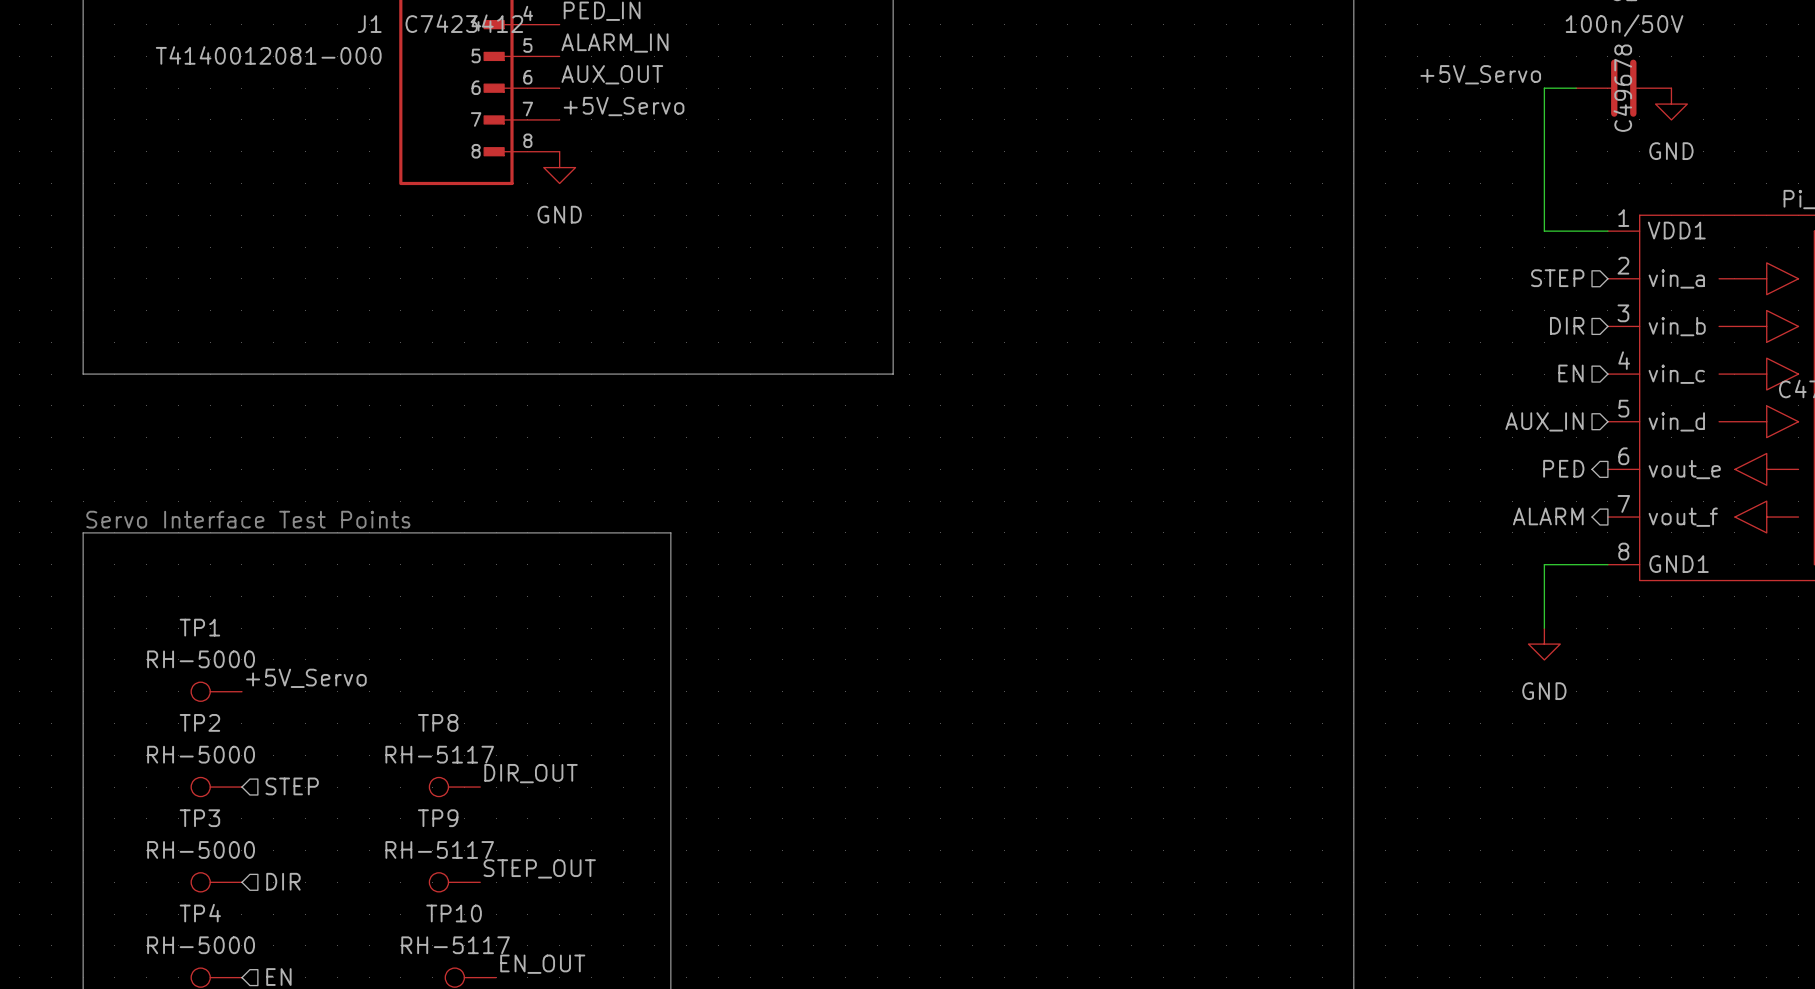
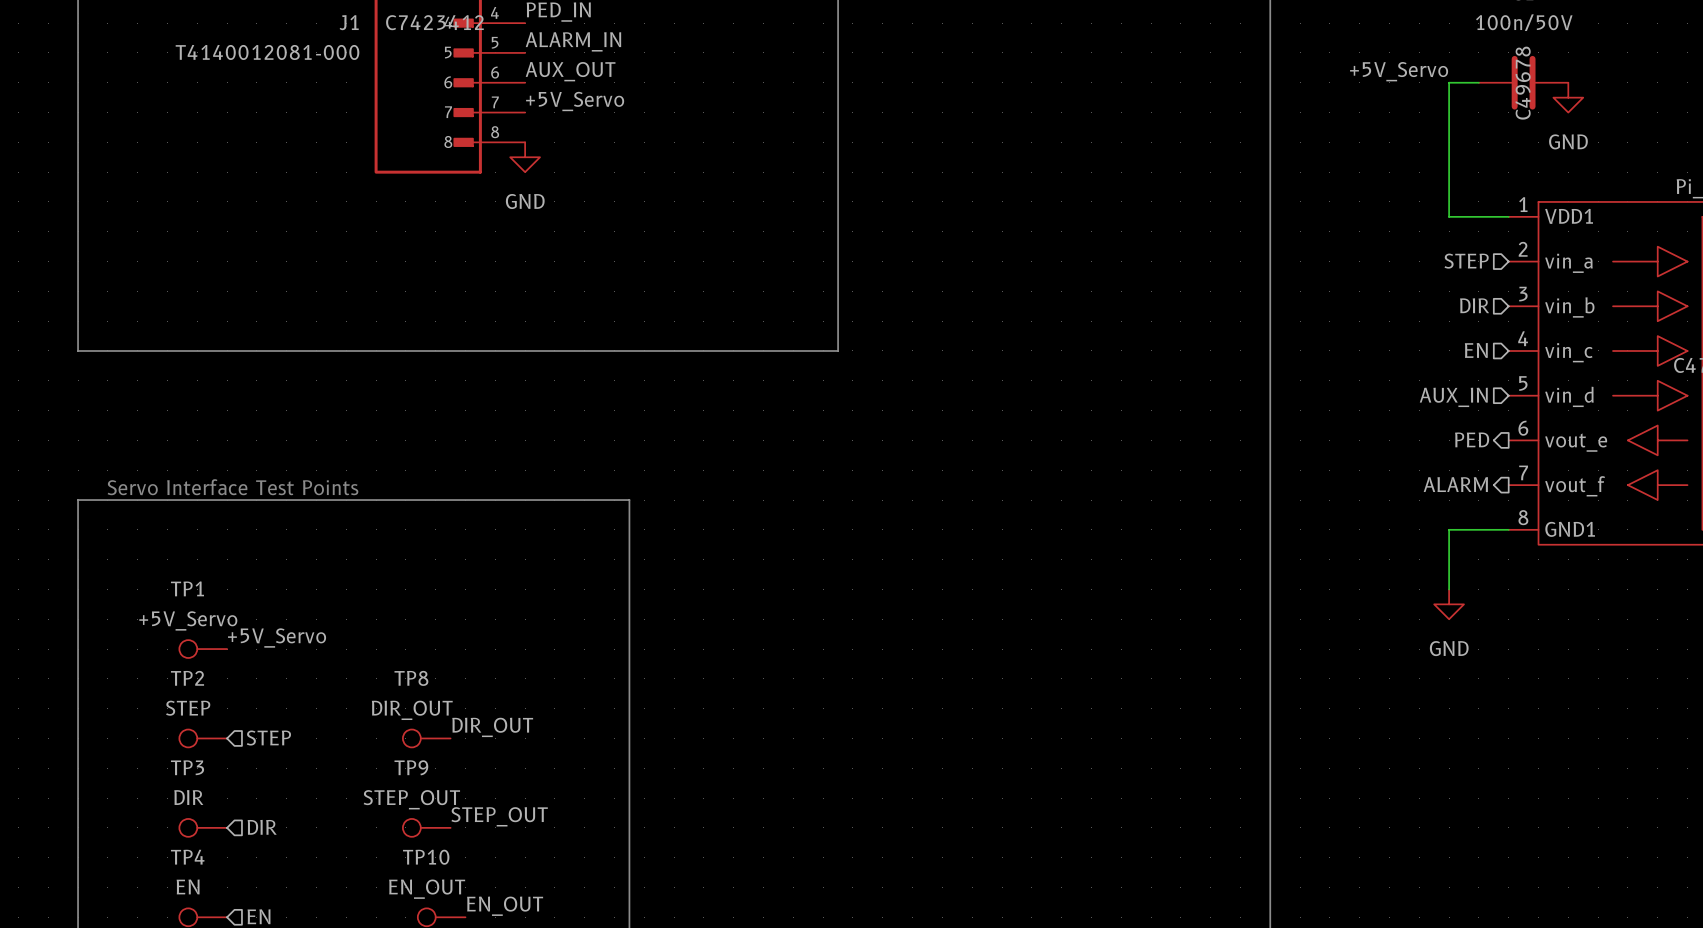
TP1 value: RH-5000 (201, 659) -> +5V_Servo (188, 620)
TP2 value: RH-5000 (201, 754) -> STEP (188, 708)
TP8 value: RH-5117 (439, 754) -> DIR_OUT (412, 710)
TP3 value: RH-5000 (201, 849) -> DIR (188, 797)
TP9 value: RH-5117 (439, 849) -> STEP_OUT (411, 799)
TP4 value: RH-5000 (201, 945) -> EN (188, 886)
TP10 value: RH-5117 (455, 945) -> EN_OUT (427, 889)

